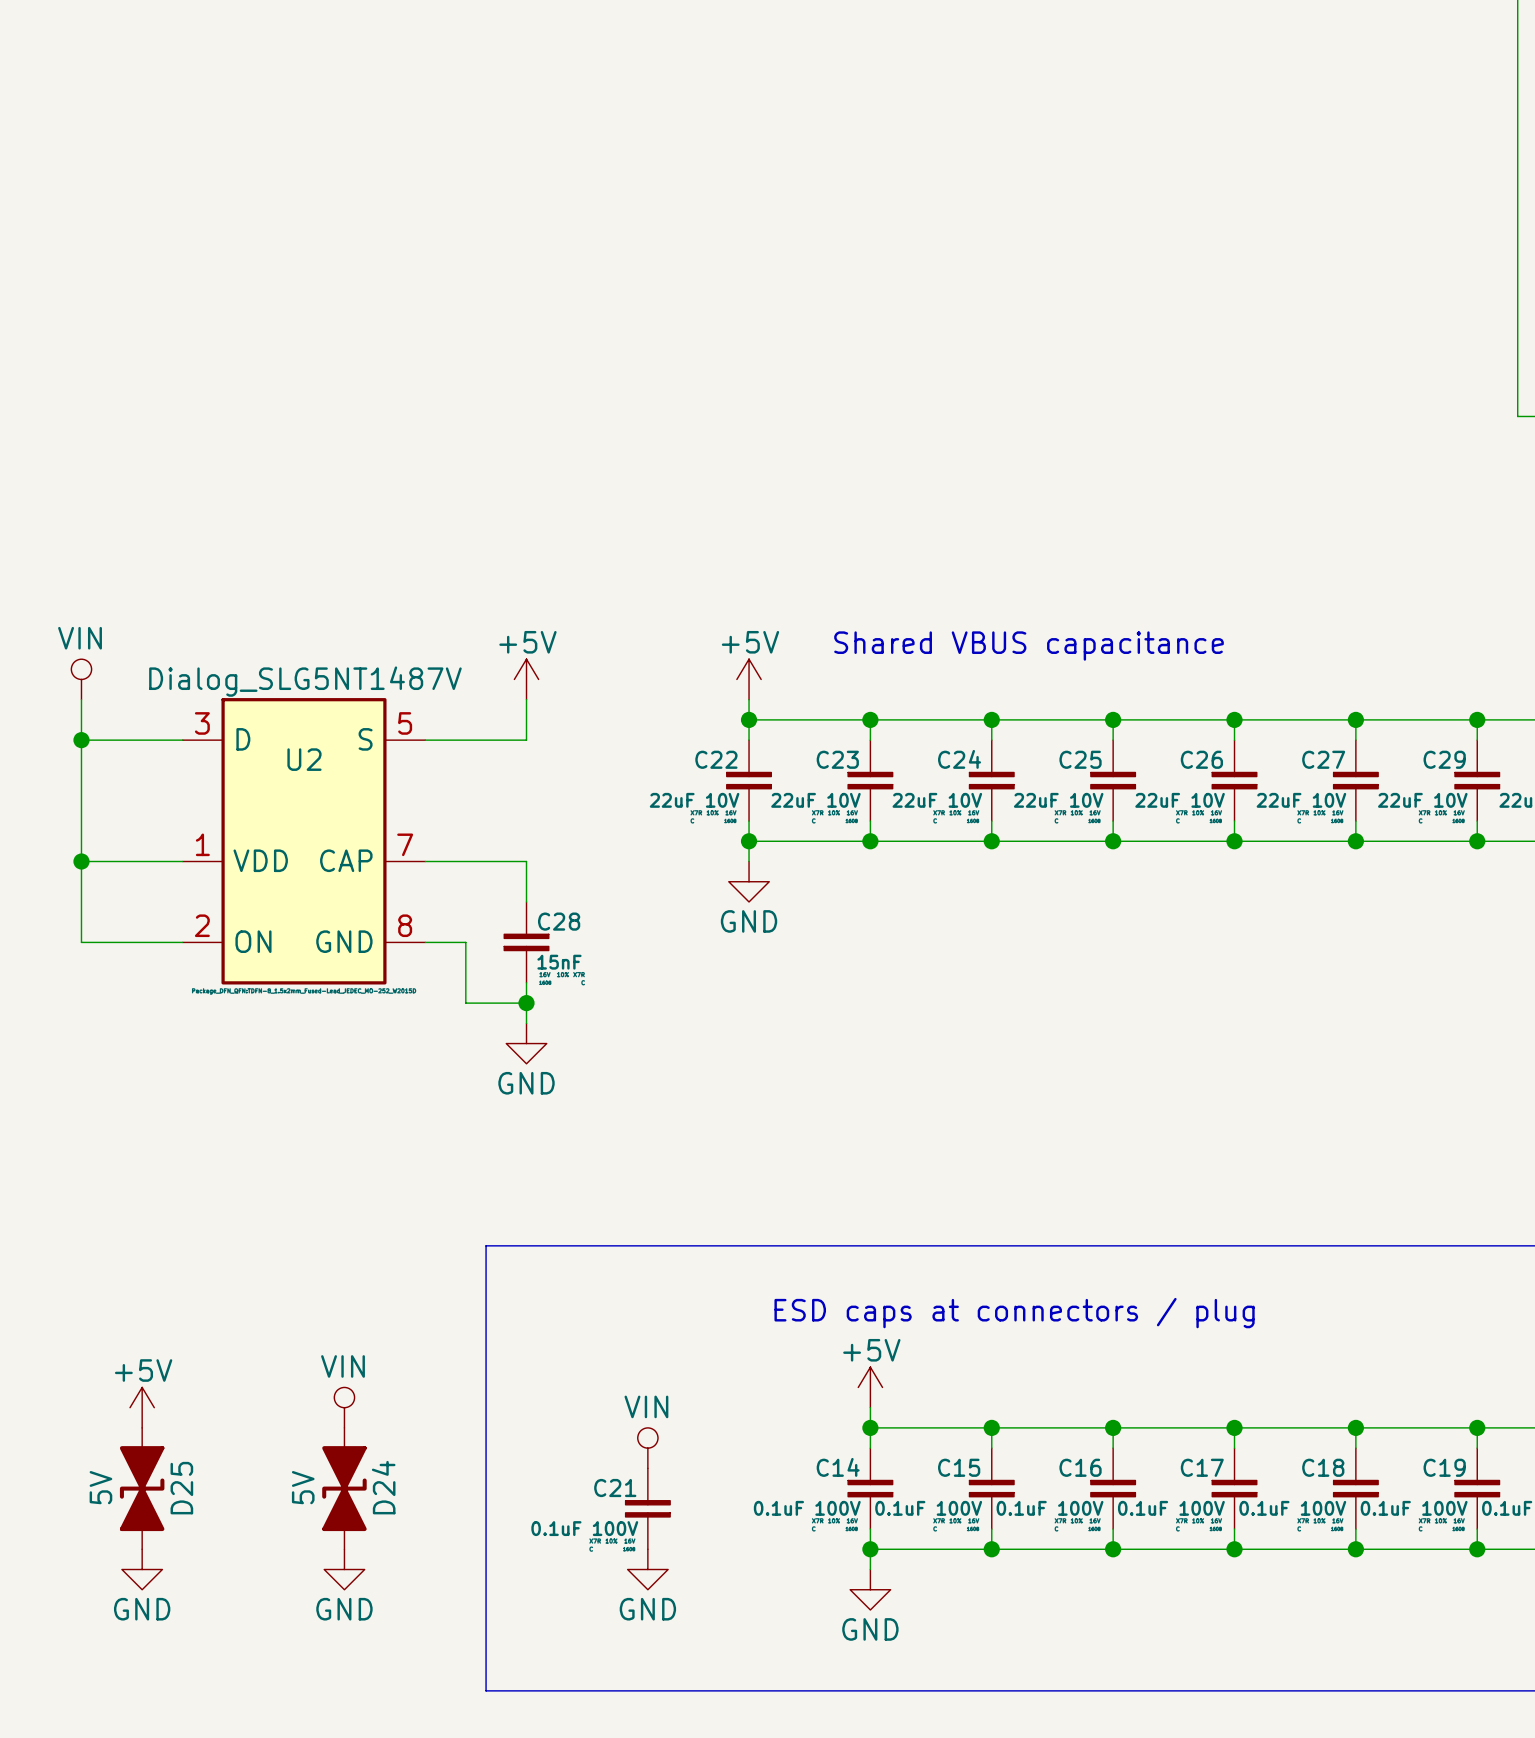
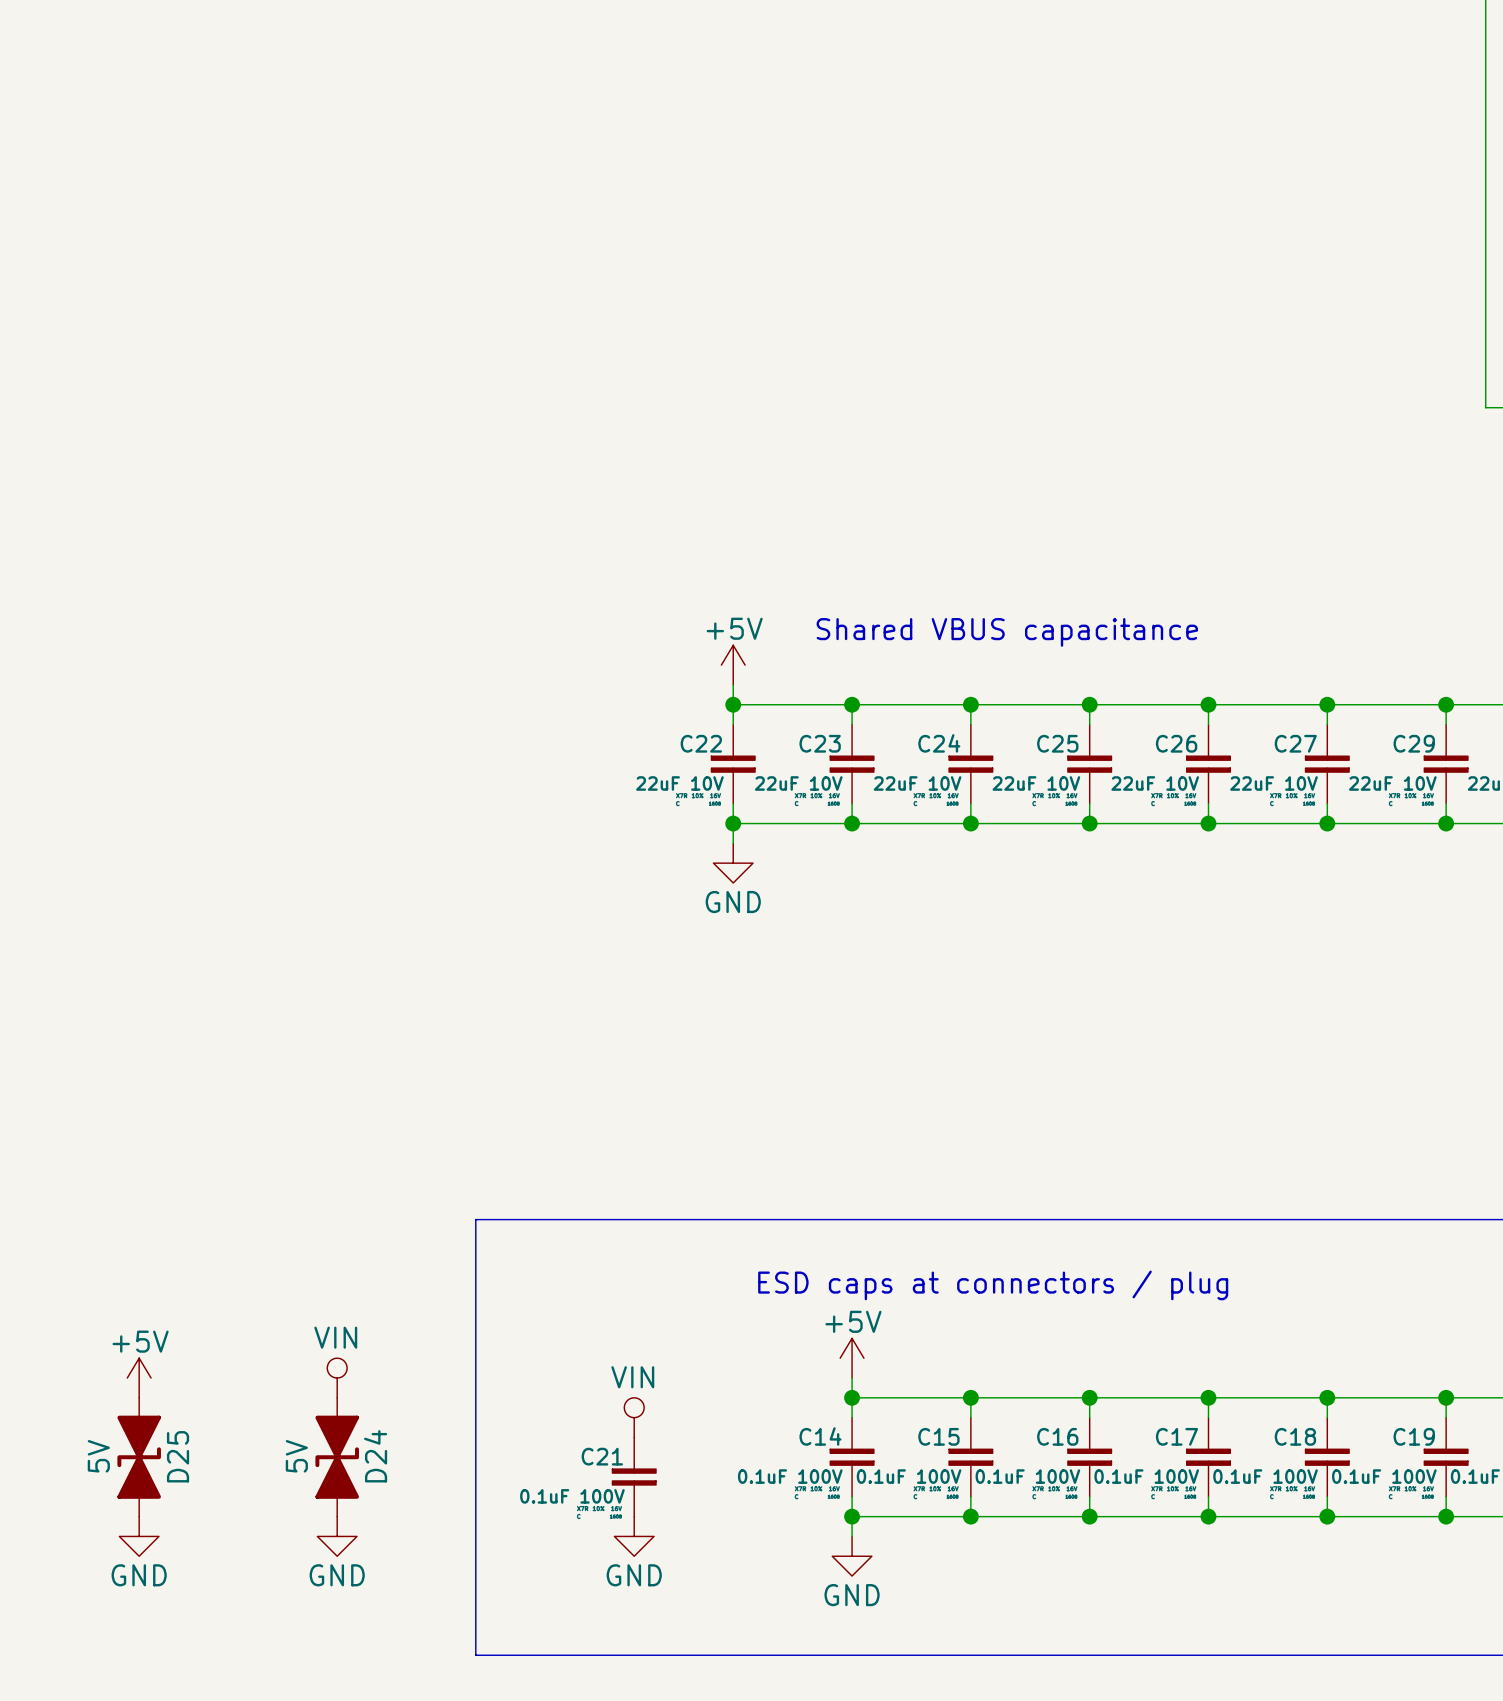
power symbol: VIN (81, 679) -> none
power symbol: +5V (526, 679) -> none
wire: (81, 699) (81, 942) (182, 942) -> none
wire: (526, 699) (526, 740) (425, 740) -> none
wire: (81, 740) (182, 740) -> none
junction: (81, 740) -> none
U2: Dialog_SLG5NT1487V (303, 841) -> none
wire: (81, 861) (182, 861) -> none
junction: (81, 861) -> none
wire: (425, 861) (526, 861) (526, 901) -> none
wire: (425, 942) (465, 942) (465, 1003) (526, 1003) -> none
C28: 15nF (526, 942) -> none
wire: (526, 982) (526, 1023) -> none
junction: (526, 1003) -> none
power symbol: GND (526, 1043) -> none

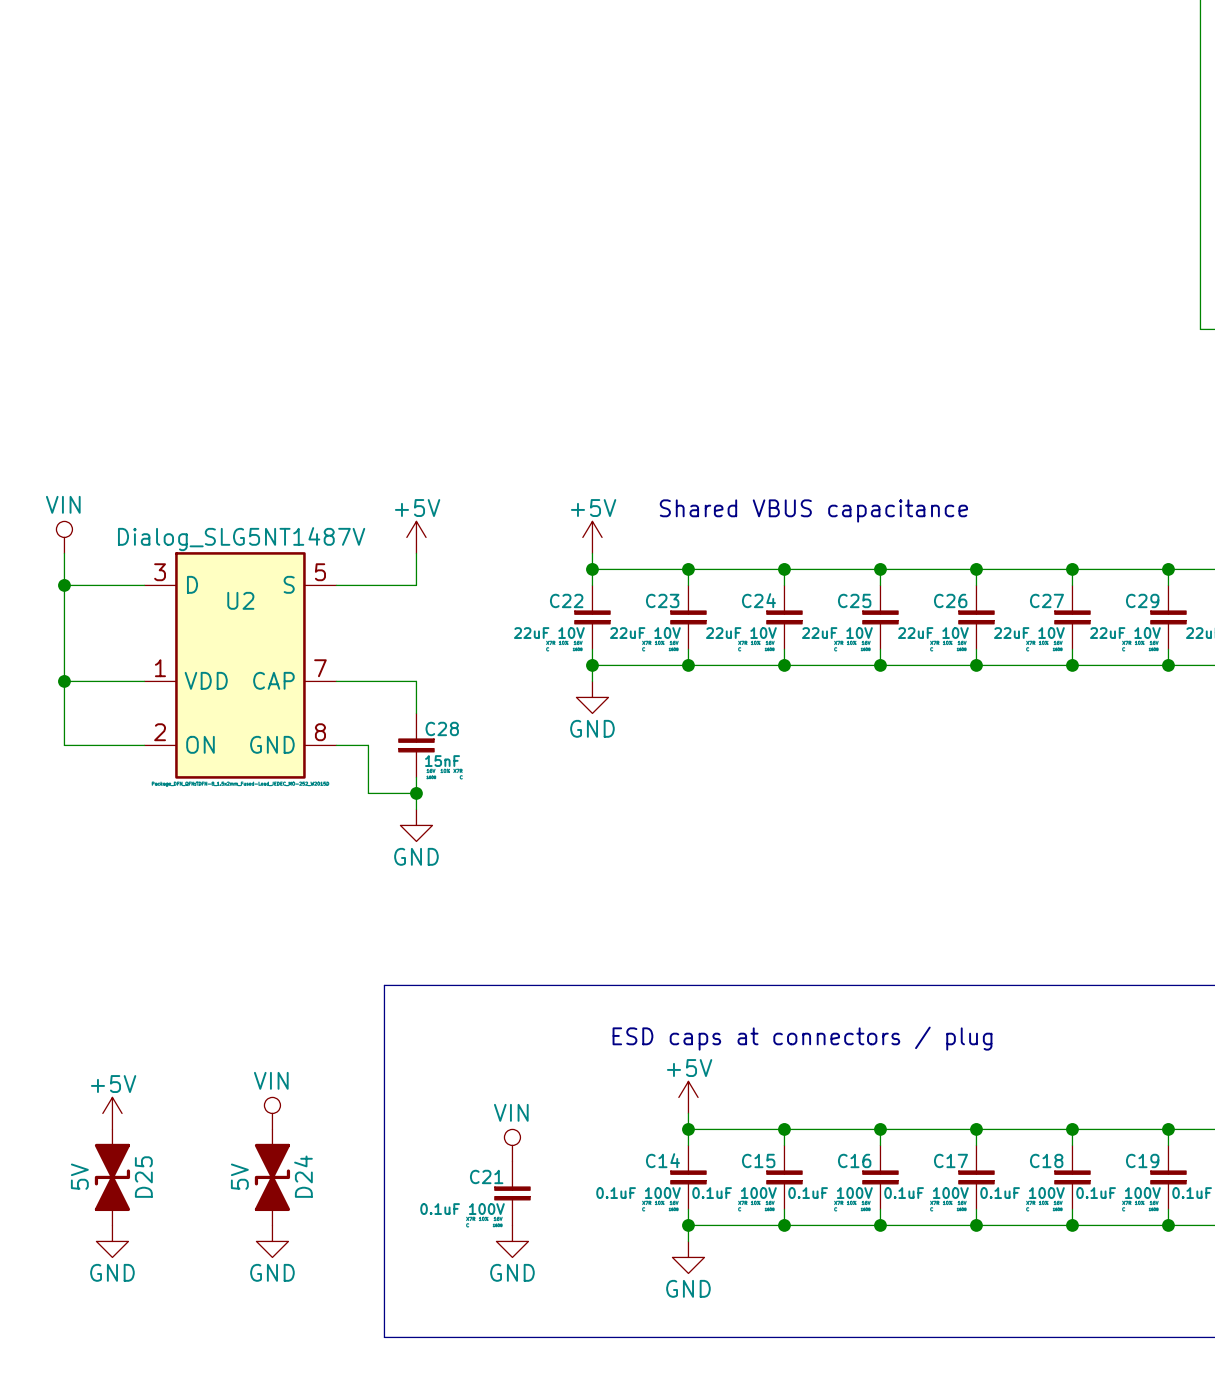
power symbol: none -> VIN (64, 537)
power symbol: none -> +5V (416, 537)
wire: none -> (64, 553) (64, 745) (144, 745)
wire: none -> (416, 553) (416, 585) (336, 585)
wire: none -> (64, 585) (144, 585)
junction: none -> (64, 585)
U2: none -> Dialog_SLG5NT1487V (240, 665)
wire: none -> (64, 681) (144, 681)
junction: none -> (64, 681)
wire: none -> (336, 681) (416, 681) (416, 713)
wire: none -> (336, 745) (368, 745) (368, 793) (416, 793)
C28: none -> 15nF (416, 745)
wire: none -> (416, 777) (416, 809)
junction: none -> (416, 793)
power symbol: none -> GND (416, 825)

